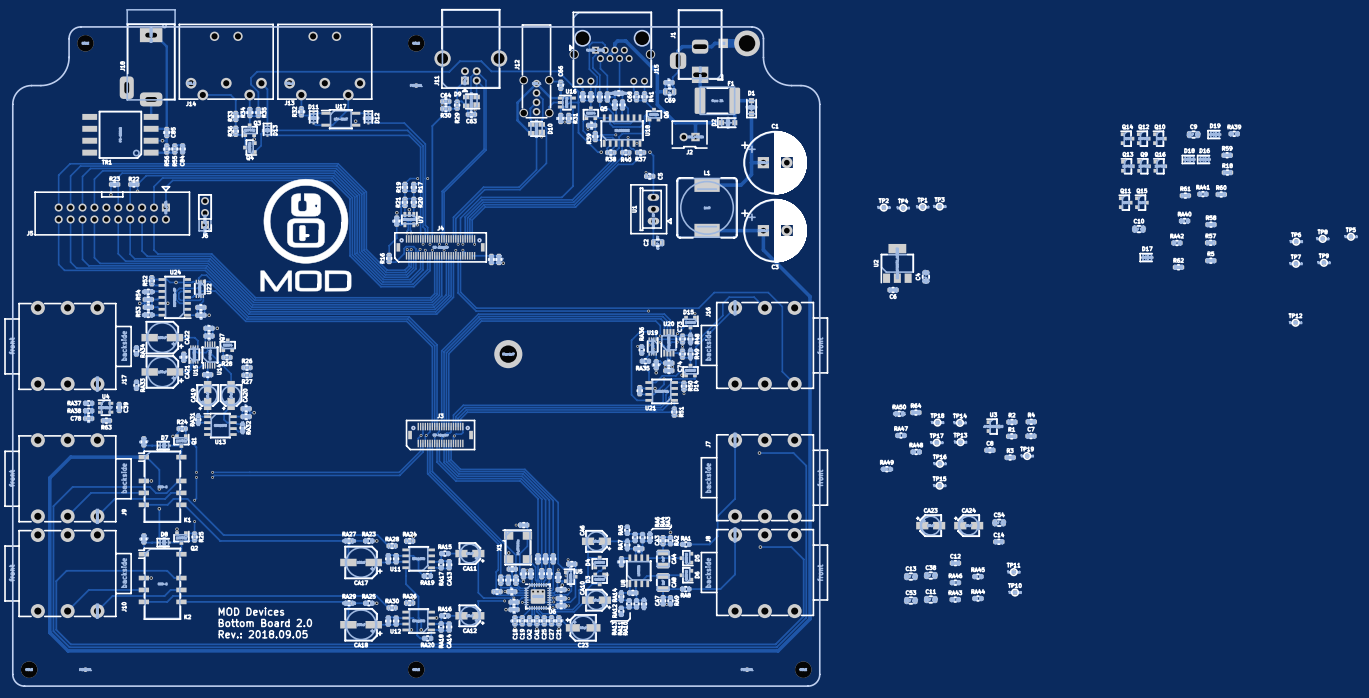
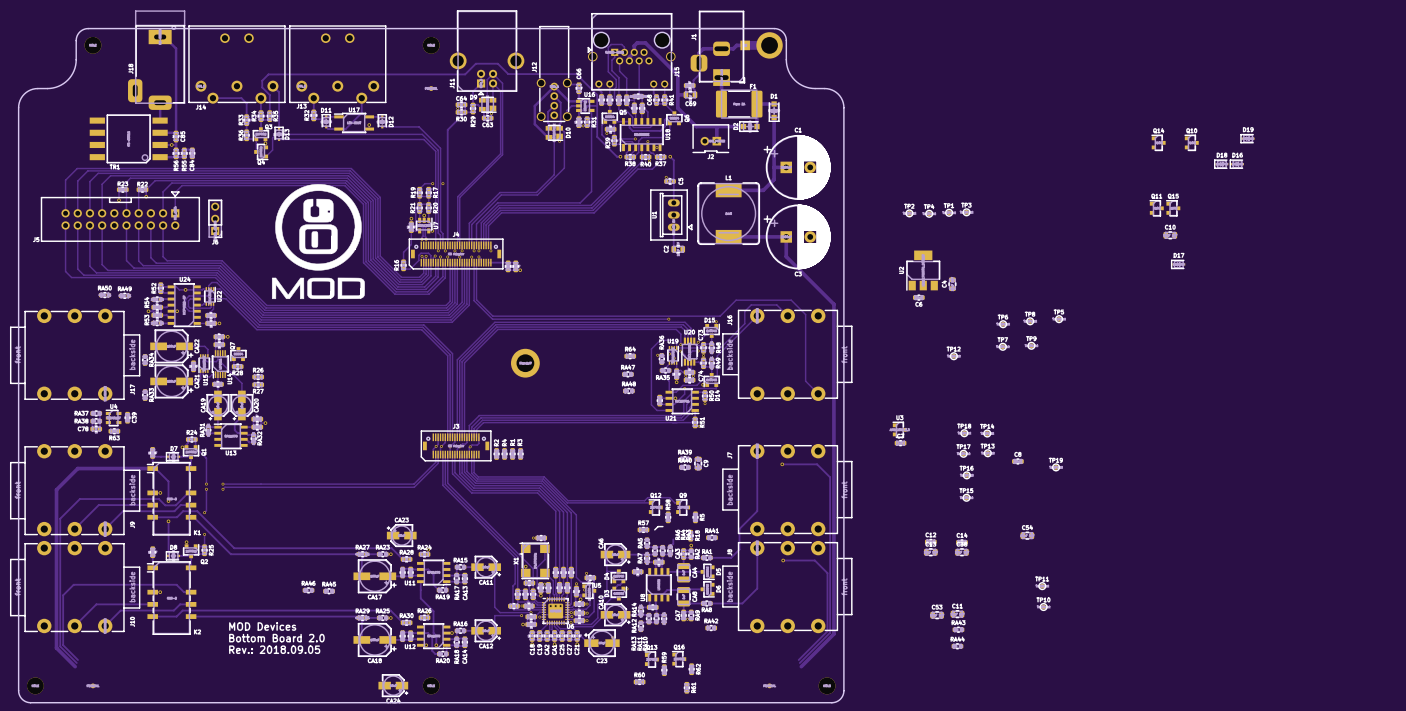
part position: (1234, 133) -> (684, 459)
part rotation: 0° (1193, 134) -> 90° clockwise (698, 463)
part position: (1193, 134) -> (698, 463)
part position: (1143, 138) -> (655, 507)
part rotation: 0° (1227, 155) -> 90° clockwise (664, 670)
part position: (1227, 155) -> (664, 670)
part position: (1127, 166) -> (651, 659)
part position: (1144, 166) -> (683, 507)
part position: (1160, 166) -> (679, 659)
part rotation: 0° (1227, 172) -> 90° clockwise (690, 535)
part position: (1227, 172) -> (690, 535)
drawing shape: [260, 178, 352, 292] -> [271, 184, 365, 300]
part position: (1202, 194) -> (711, 537)
part position: (1221, 194) -> (639, 681)
part rotation: 0° (1185, 195) -> 90° clockwise (686, 687)
part position: (1185, 195) -> (686, 687)
part position: (1184, 221) -> (684, 467)
part rotation: 0° (1210, 224) -> 90° clockwise (668, 517)
part position: (1210, 224) -> (668, 517)
part position: (1350, 236) -> (1059, 319)
part position: (1322, 238) -> (1030, 321)
part position: (1296, 241) -> (1003, 324)
part position: (1176, 242) -> (711, 628)
part position: (1210, 242) -> (643, 529)
part rotation: 0° (1210, 260) -> 90° clockwise (695, 517)
part position: (1210, 260) -> (695, 517)
part position: (1323, 262) -> (1031, 345)
part position: (1295, 263) -> (1002, 346)
part rotation: 0° (1178, 267) -> 90° clockwise (691, 669)
part position: (1178, 267) -> (691, 669)
part position: (1295, 322) -> (953, 356)
part position: (915, 412) -> (630, 356)
part position: (899, 413) -> (104, 295)
part rotation: 0° (1031, 421) -> 90° clockwise (504, 453)
part position: (1031, 421) -> (504, 453)
part rotation: 0° (1011, 422) -> 90° clockwise (496, 453)
part position: (1011, 422) -> (496, 453)
part position: (993, 426) -> (899, 429)
part position: (900, 435) -> (627, 374)
part rotation: 0° (1011, 436) -> 90° clockwise (512, 453)
part position: (1011, 436) -> (512, 453)
part position: (1030, 436) -> (900, 443)
track: none -> (471, 454) (471, 473) (477, 479) (543, 479) (567, 502) (651, 502)
track: none -> (474, 454) (474, 472) (478, 476) (544, 476) (568, 500) (644, 500) (647, 497) (669, 497) (674, 502) (678, 502)
part position: (916, 451) -> (628, 390)
part rotation: 0° (1010, 457) -> 90° clockwise (520, 453)
part position: (1010, 457) -> (520, 453)
part position: (886, 469) -> (124, 295)
line: none -> (662, 526) (658, 526) (654, 529)
line: (671, 525) (669, 528) (651, 530) -> none
part position: (930, 525) -> (401, 535)
part rotation: 0° (968, 525) -> 180° (393, 685)
part position: (968, 525) -> (393, 685)
track: none -> (673, 539) (673, 543) (670, 547)
part position: (998, 541) -> (961, 542)
track: (159, 542) (143, 542) -> none
track: (621, 558) (629, 558) -> none
part rotation: 0° (621, 561) -> 90° clockwise (637, 571)
part position: (955, 563) -> (930, 541)
part position: (930, 575) -> (961, 552)
part position: (910, 576) -> (930, 552)
part position: (977, 576) -> (329, 591)
part position: (955, 582) -> (308, 590)
part position: (977, 598) -> (957, 646)
part position: (955, 599) -> (958, 629)
line: (630, 612) (630, 618) (627, 620) (610, 621) -> none
track: (70, 644) (775, 644) -> none
track: (69, 647) (776, 647) -> none
track: (68, 650) (778, 650) -> none

